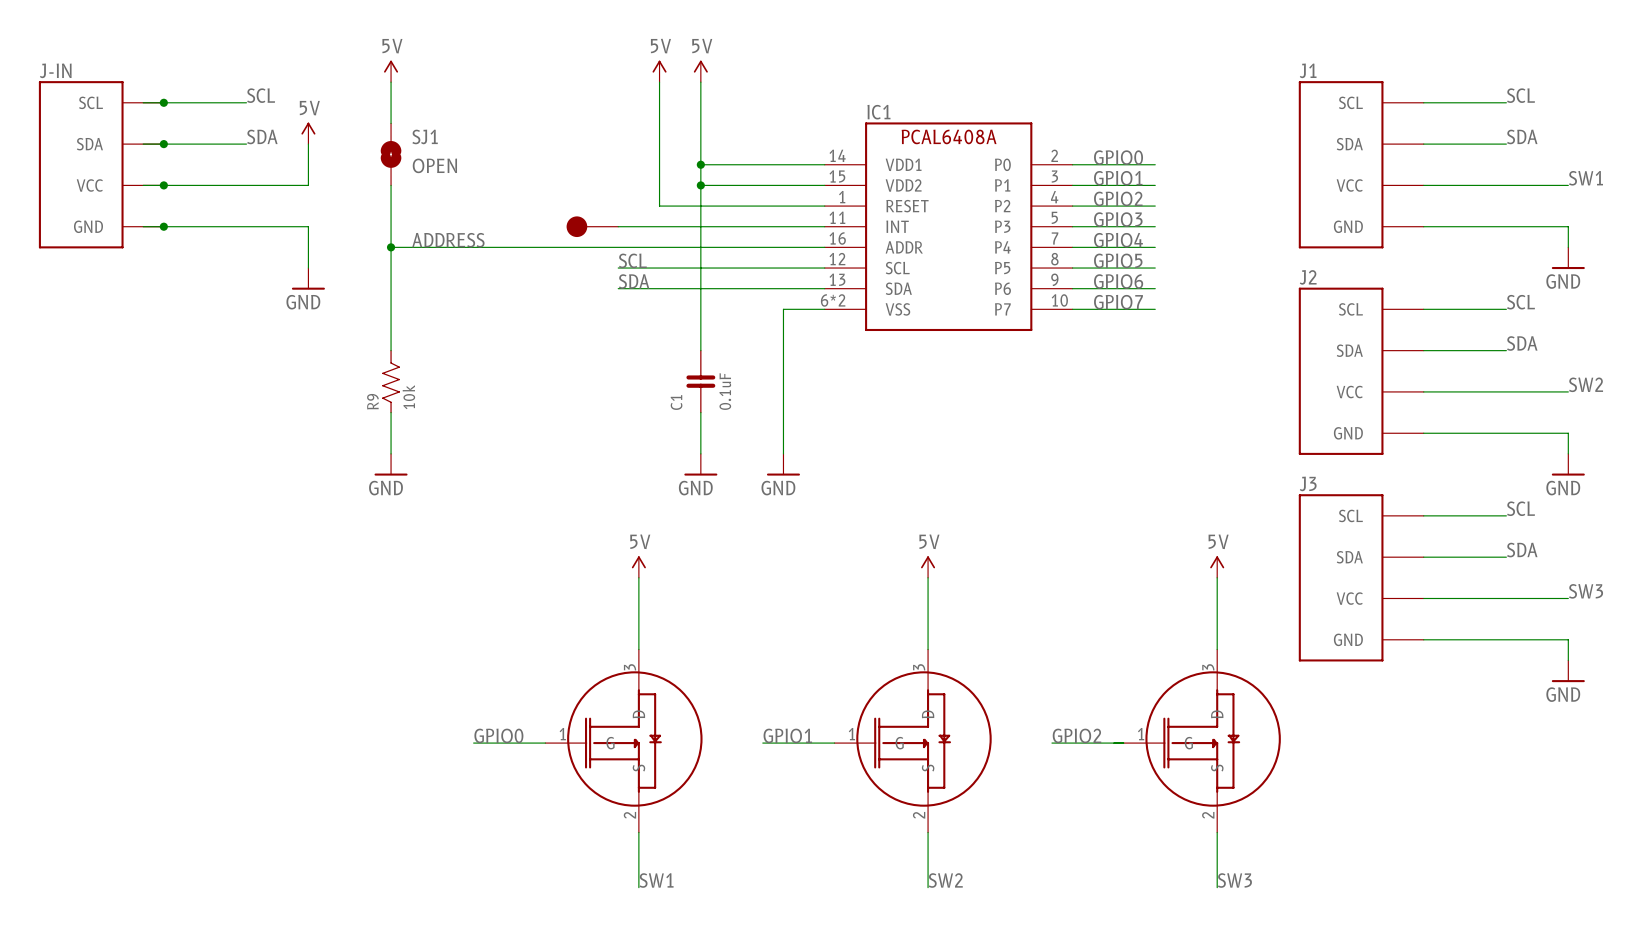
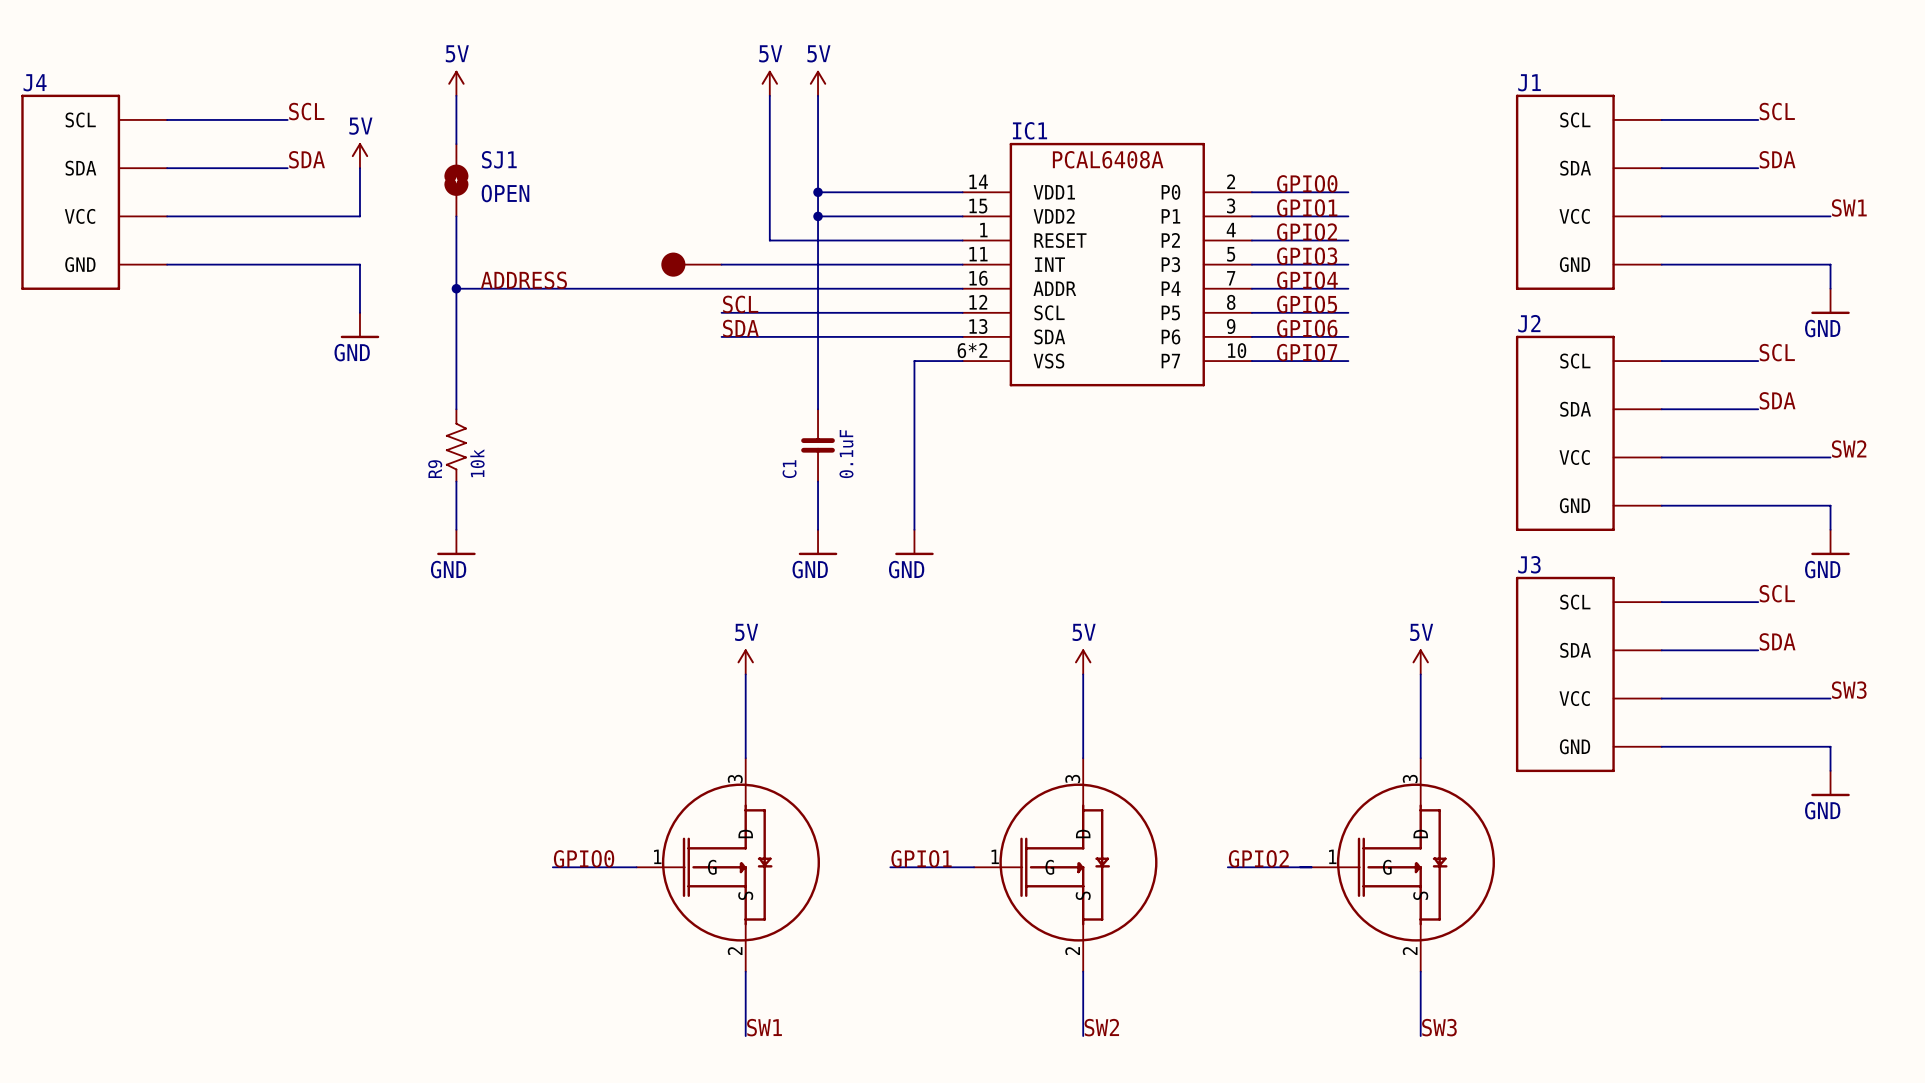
junction: (163, 102) -> none
junction: (163, 144) -> none
J4: none -> (94, 192)
J-IN: (101, 164) -> none
junction: (163, 185) -> none
junction: (163, 226) -> none

